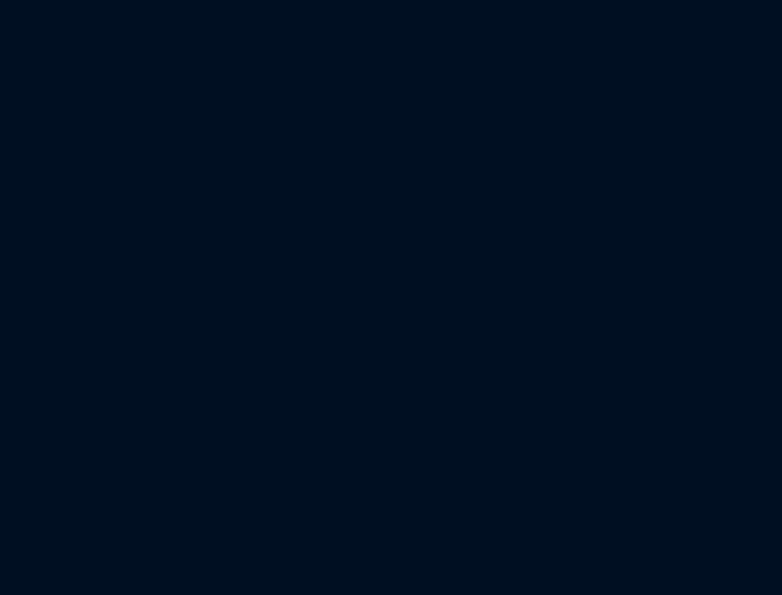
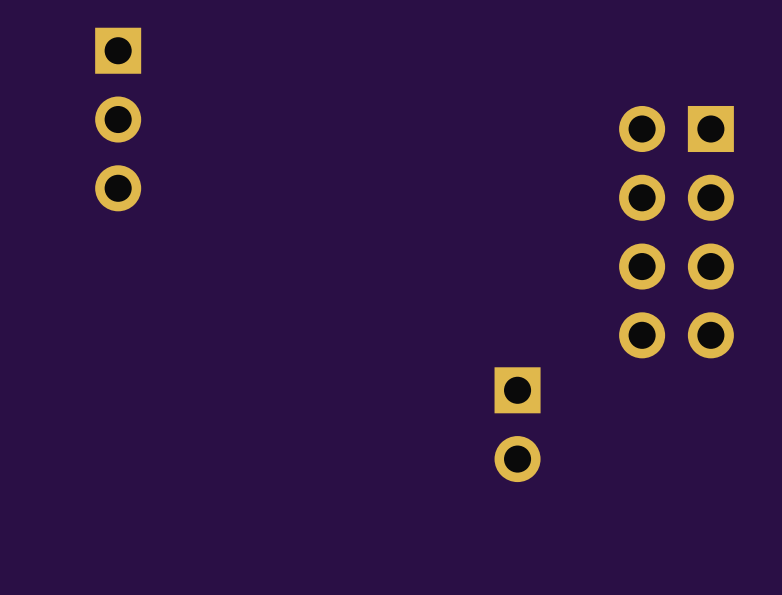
part: none -> (118, 119)
part: none -> (676, 232)
part: none -> (517, 424)

